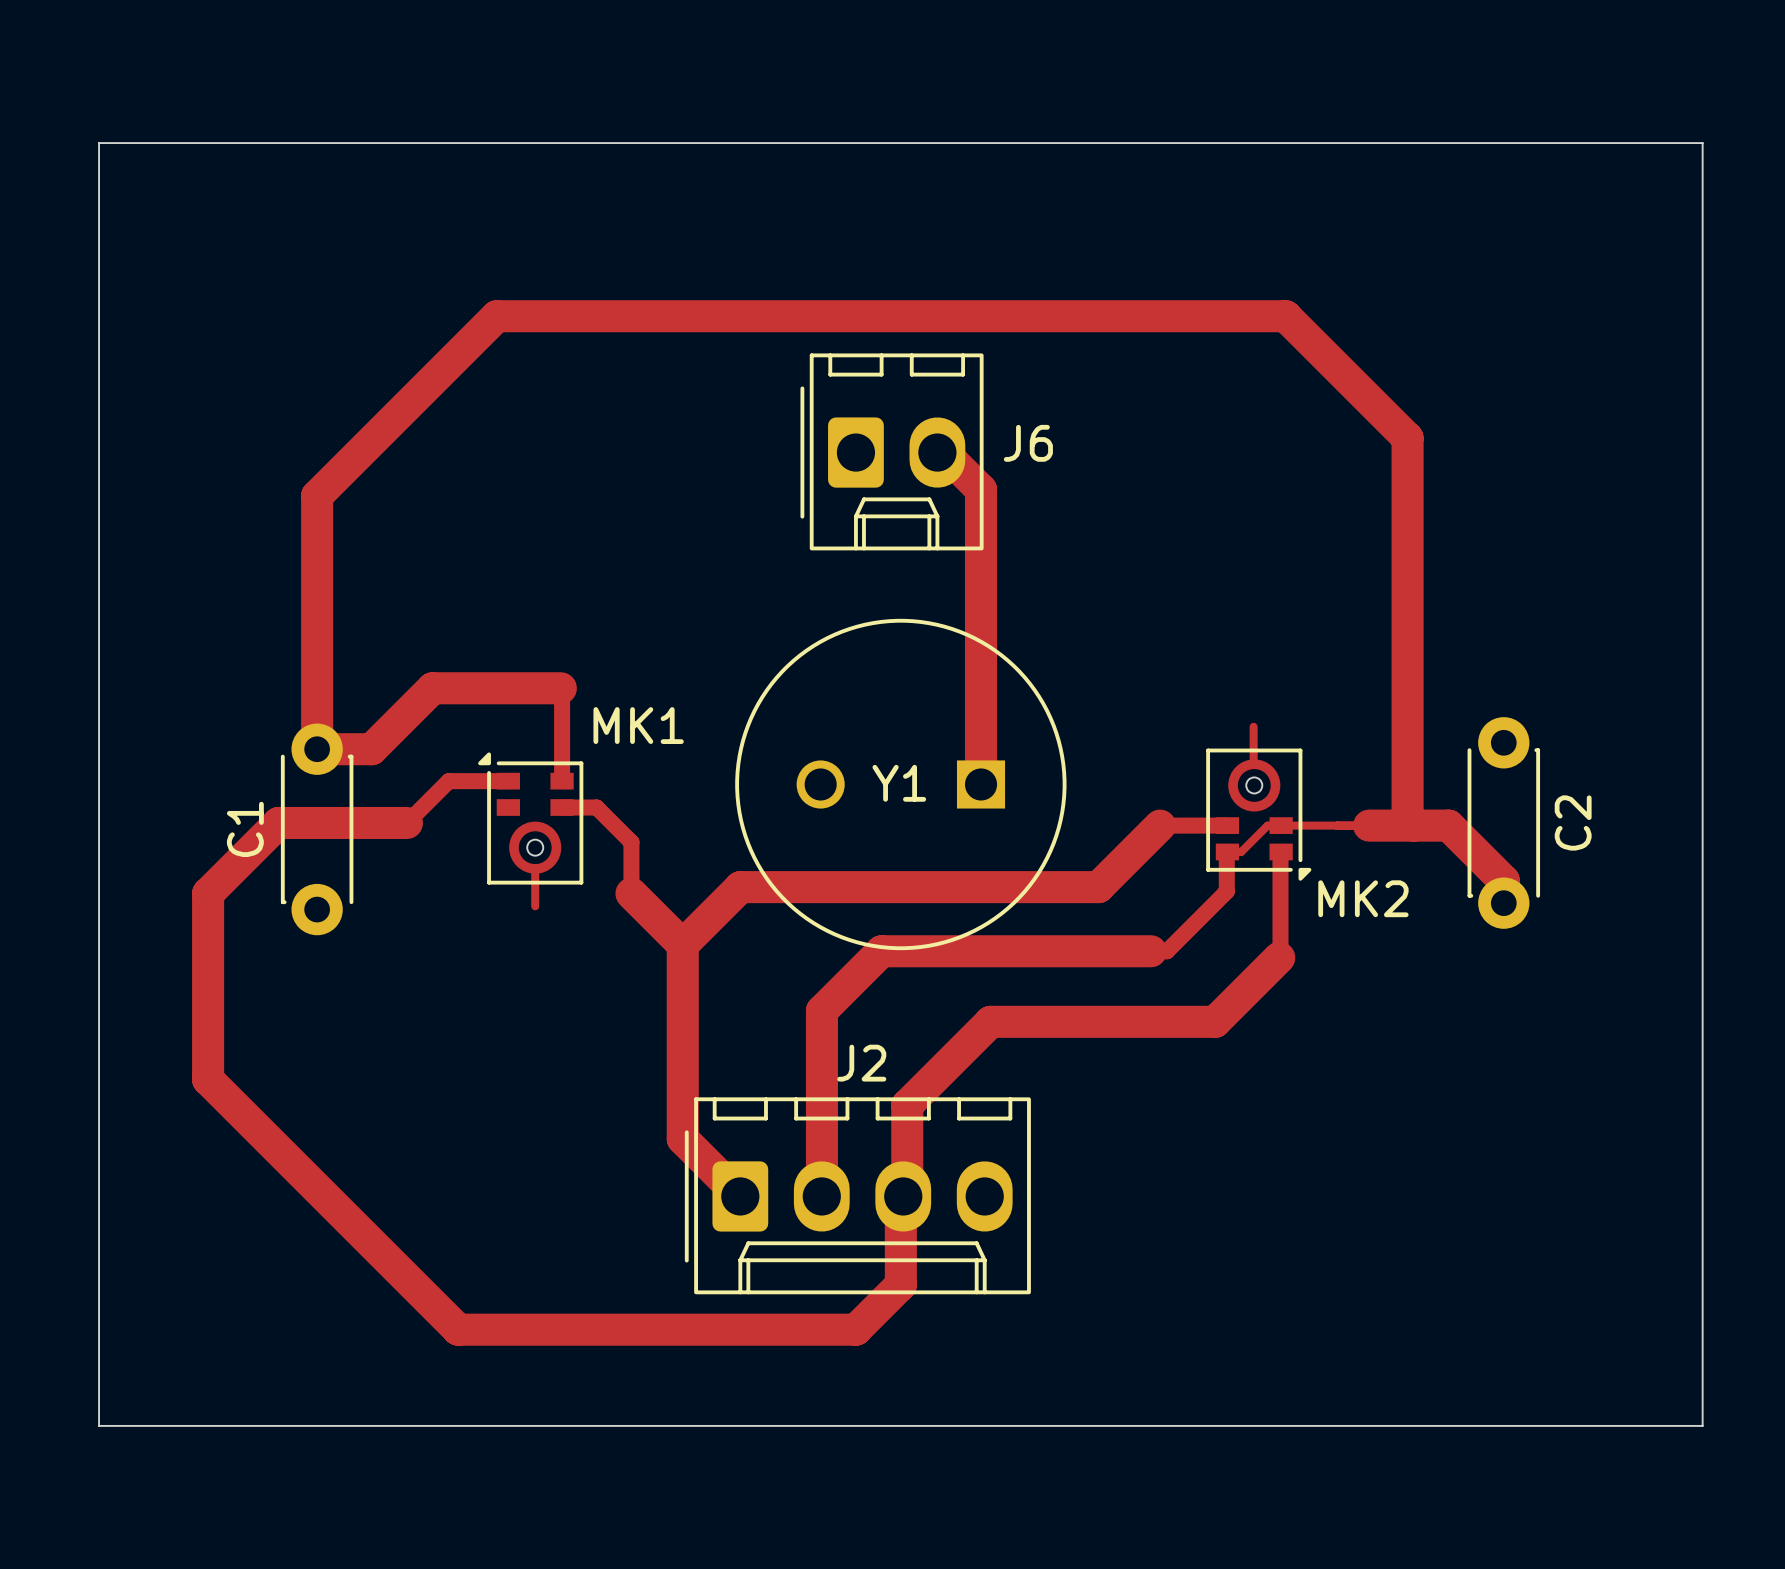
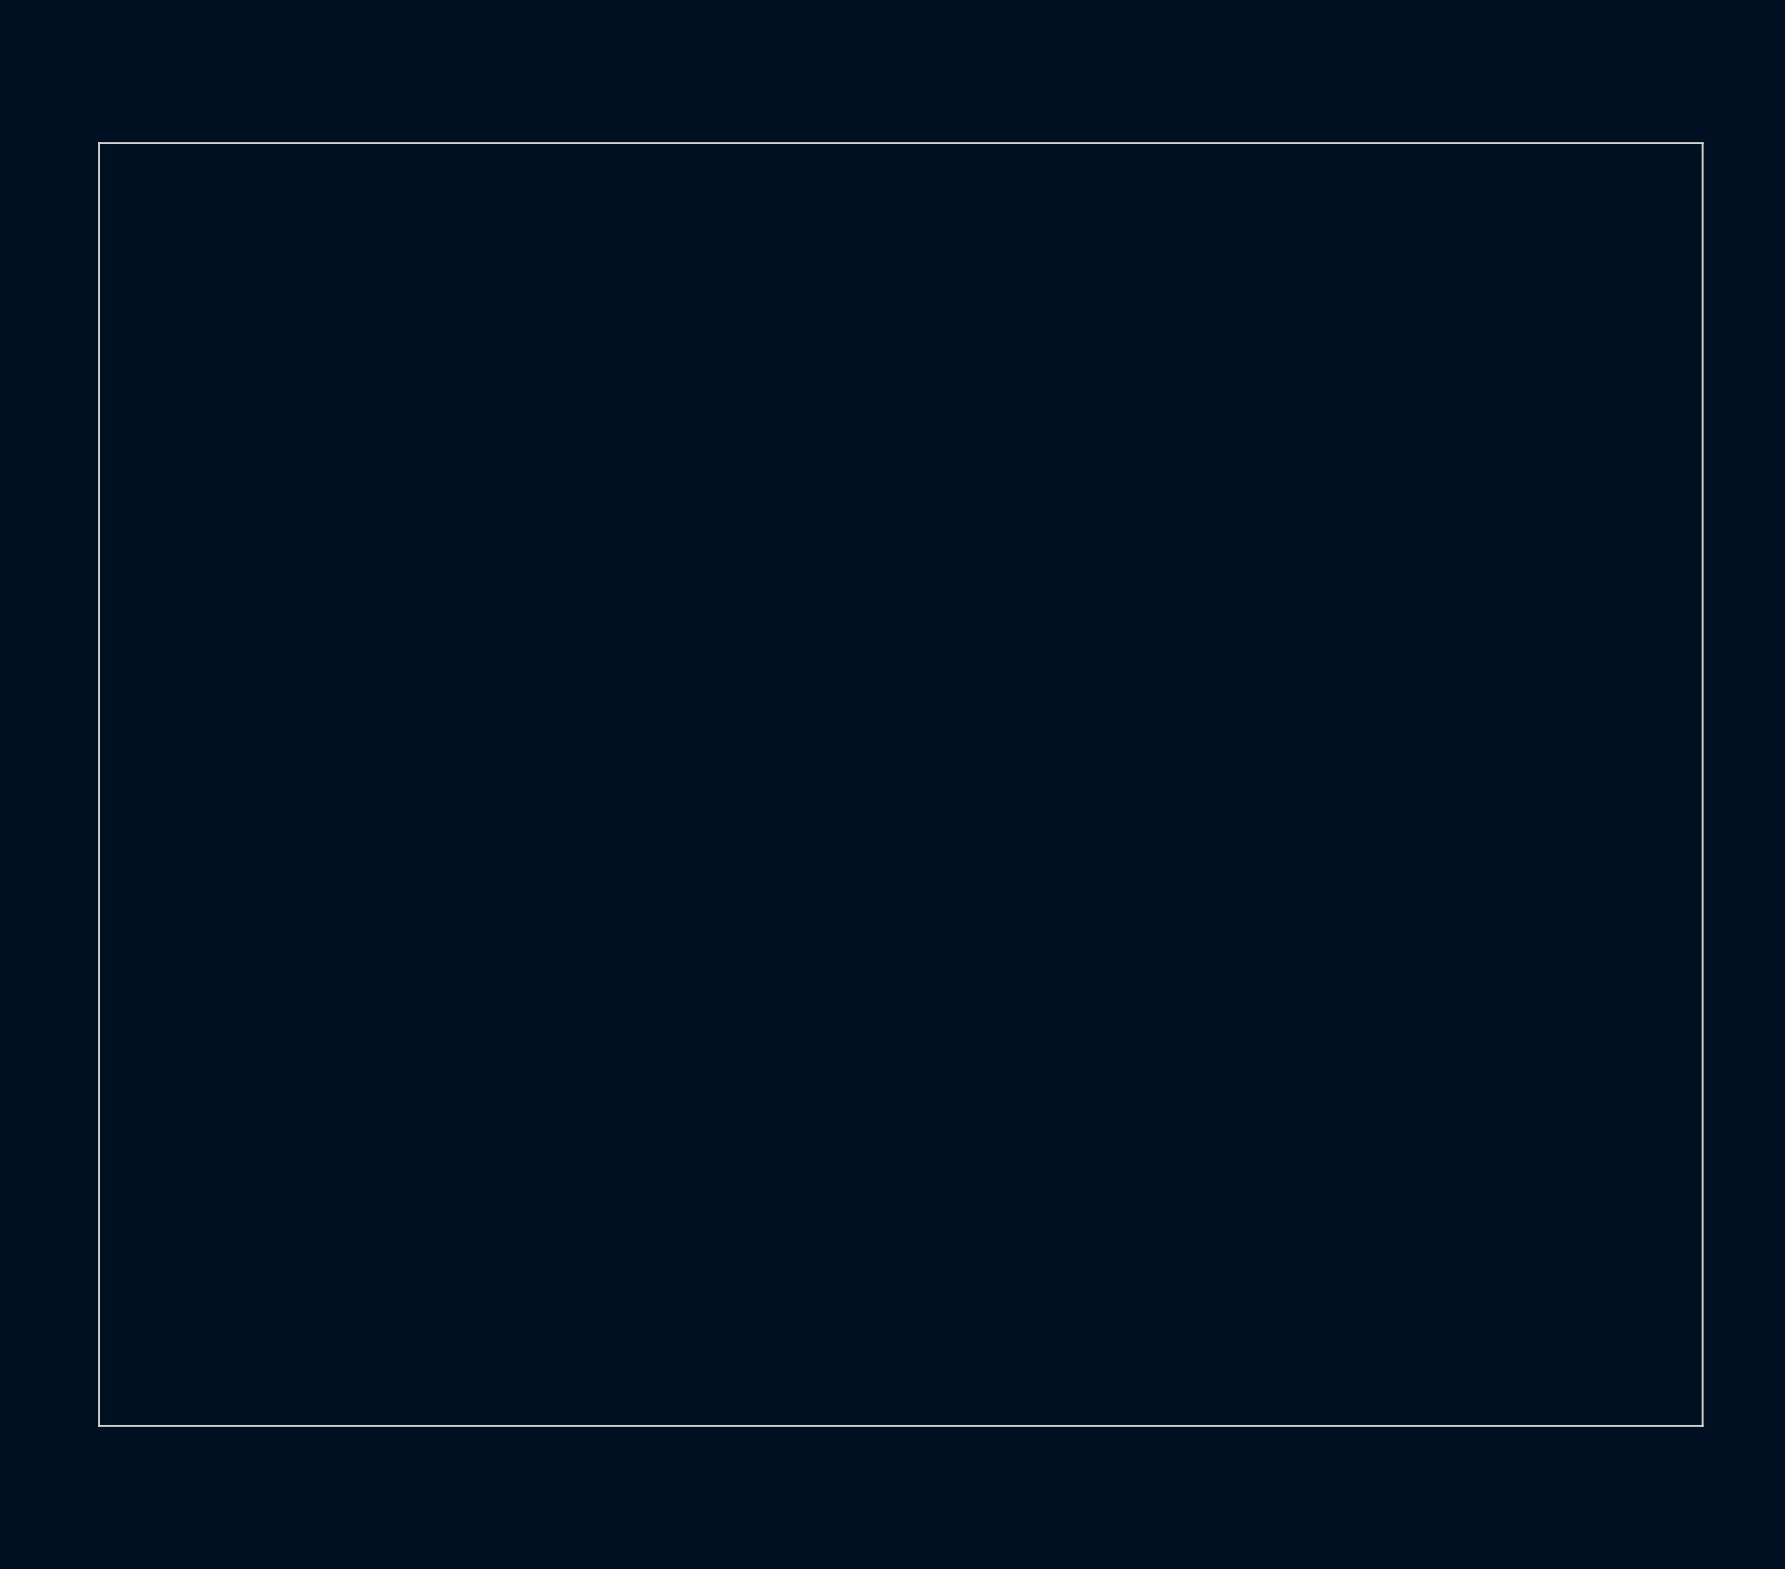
J6: (892, 451) -> none
track: (943, 452) (981, 489) (981, 784) -> none
track: (1253, 726) (1253, 764) -> none
track: (508, 781) (448, 781) (406, 822) (278, 822) (208, 893) (208, 1079) (458, 1329) (855, 1329) (900, 1284) (900, 1199) (907, 1192) (907, 1105) (990, 1021) (1215, 1021) (1280, 956) (1280, 851) -> none
track: (562, 781) (560, 688) (432, 688) (371, 749) (317, 749) (317, 495) (496, 316) (1285, 316) (1407, 438) (1407, 819) (1413, 825) -> none
Y1: (900, 784) -> none
track: (562, 807) (596, 807) (631, 842) (631, 893) (682, 944) -> none
MK2: (1258, 814) -> none
MK1: (530, 818) -> none
C2: (1503, 822) -> none
track: (1226, 825) (1160, 825) (1098, 887) (740, 887) (682, 944) -> none
C1: (317, 829) -> none
track: (535, 868) (535, 906) -> none
track: (1503, 903) (1503, 880) (1448, 825) (1267, 825) (1241, 851) (1226, 851) (1226, 891) (1167, 951) (881, 951) (821, 1010) (821, 1196) -> none
track: (682, 944) (682, 1138) (740, 1196) -> none
J2: (857, 1195) -> none

